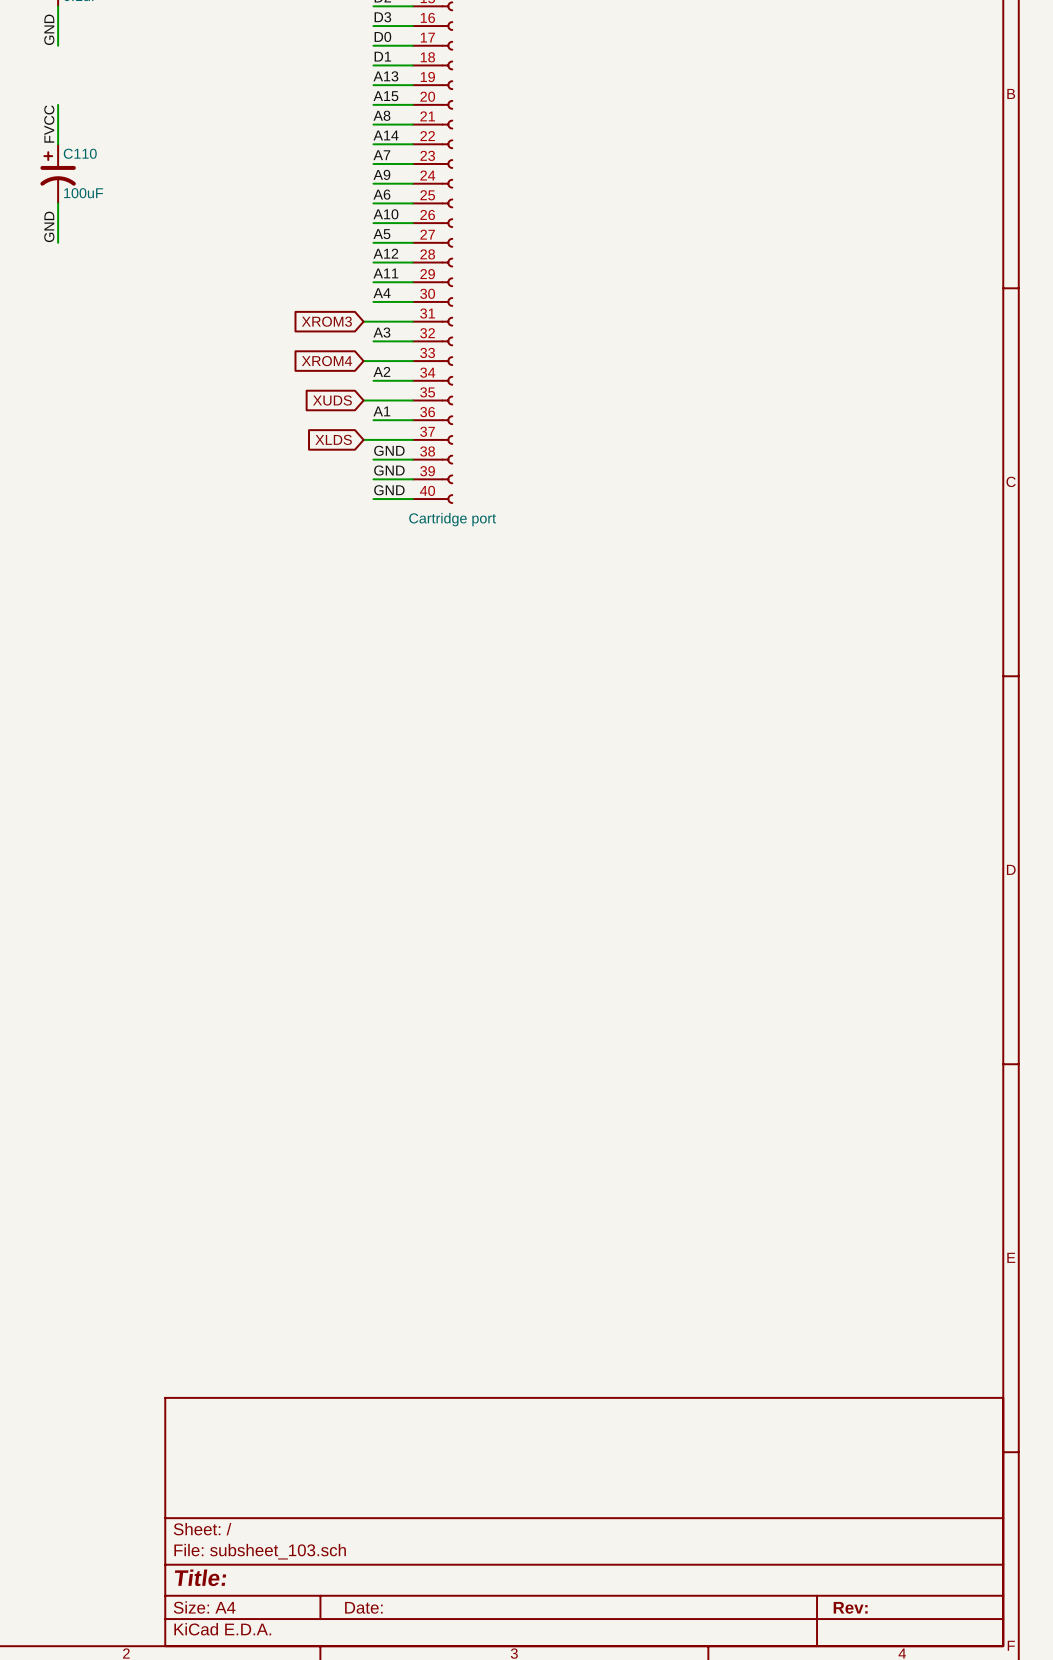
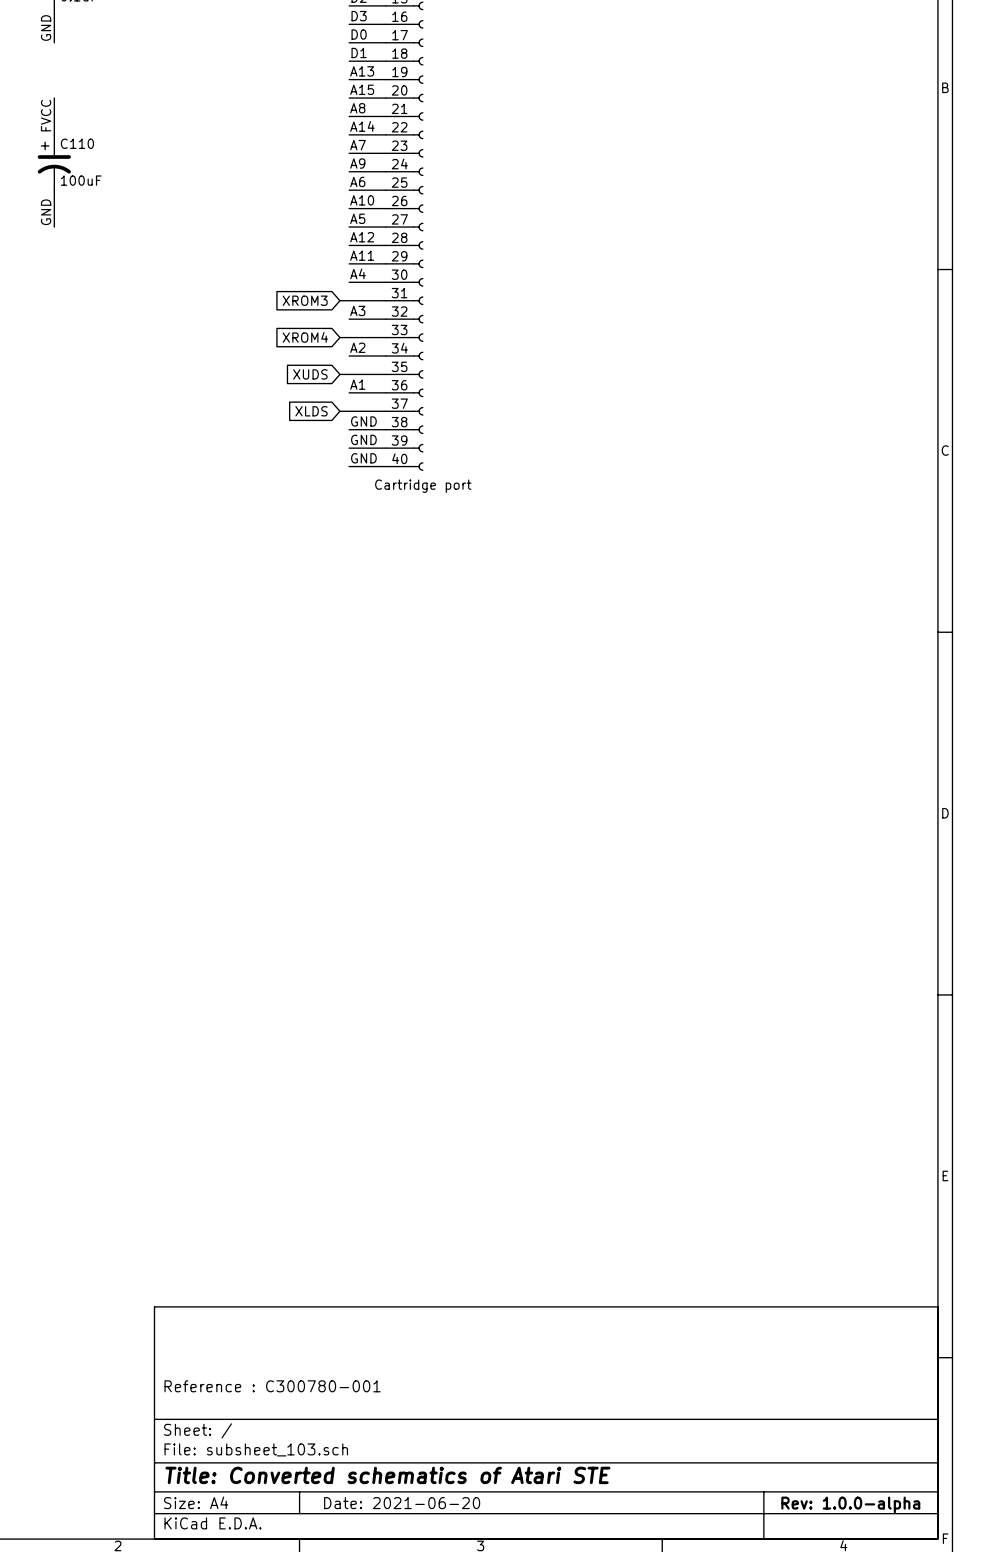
title block: none -> Reference : C300780-001 (272, 1386)
title block: Title: (200, 1577) -> Title: Converted schematics of Atari STE (387, 1475)
title block: Date: (363, 1607) -> Date: 2021-06-20 (402, 1503)
title block: Rev: (850, 1607) -> Rev: 1.0.0-alpha (850, 1504)

